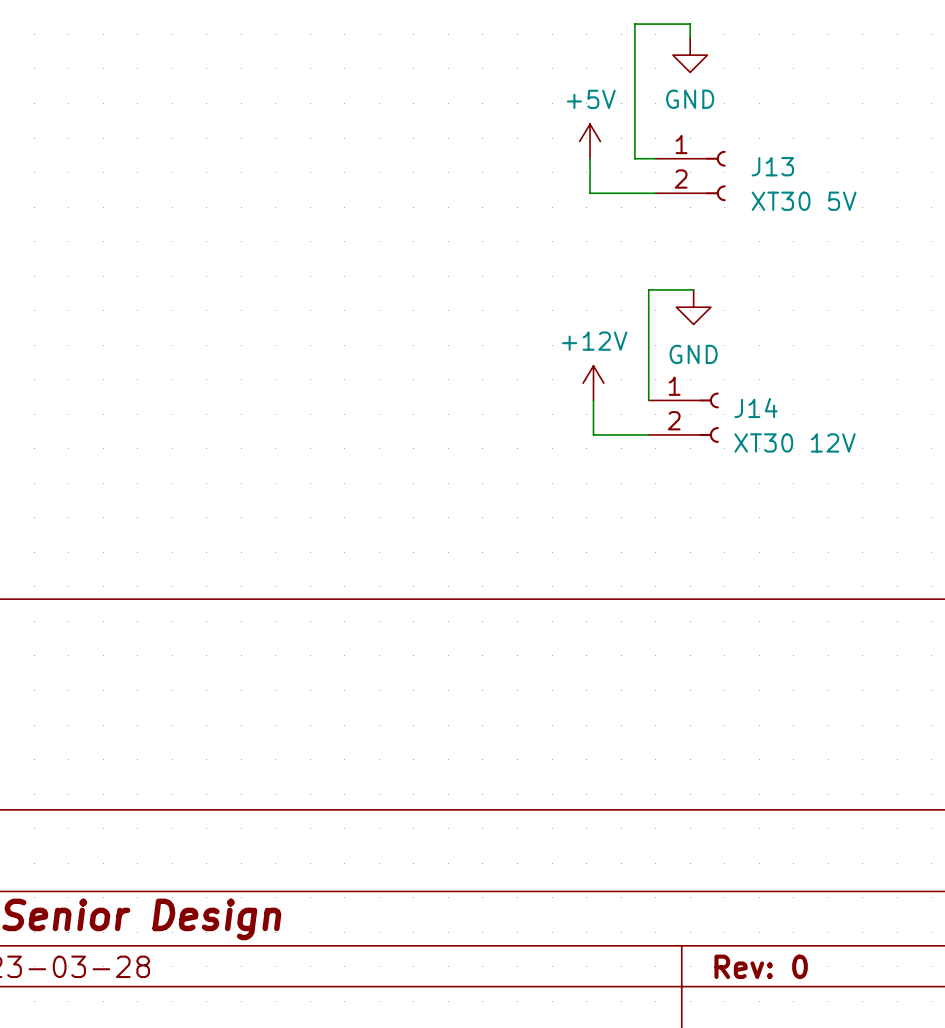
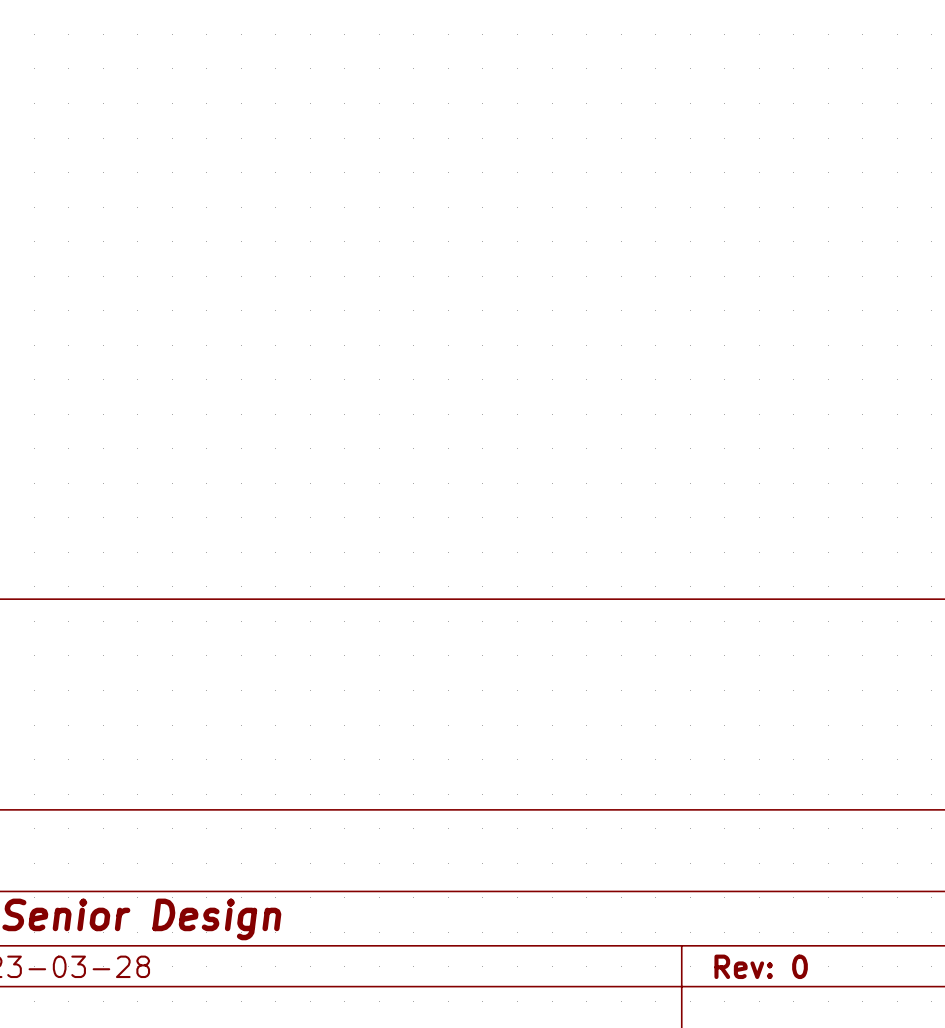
wire: (690, 37) (690, 24) (634, 24) (634, 158) (655, 158) -> none
power symbol: GND (690, 55) -> none
power symbol: +5V (590, 141) -> none
wire: (590, 158) (590, 193) (655, 193) -> none
J13: XT30 5V (690, 175) -> none
wire: (693, 289) (648, 289) (648, 400) -> none
power symbol: GND (693, 307) -> none
power symbol: +12V (593, 383) -> none
wire: (593, 400) (593, 434) (648, 434) -> none
J14: XT30 12V (683, 417) -> none

